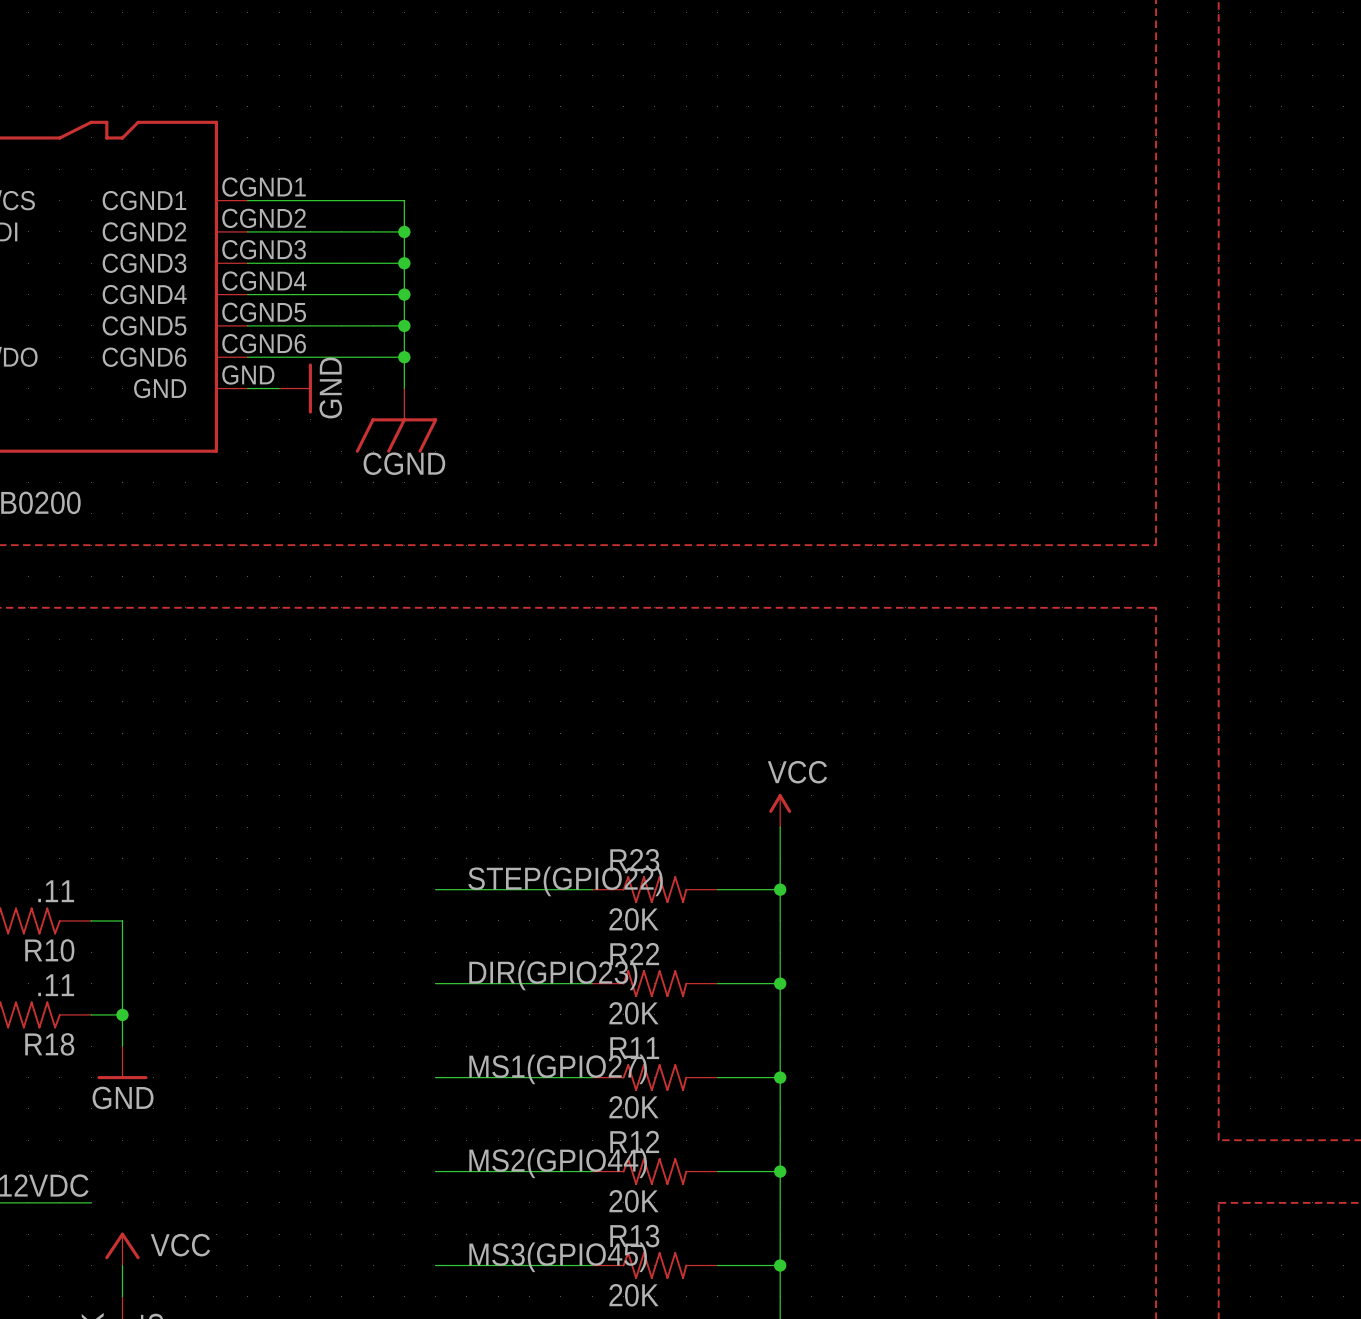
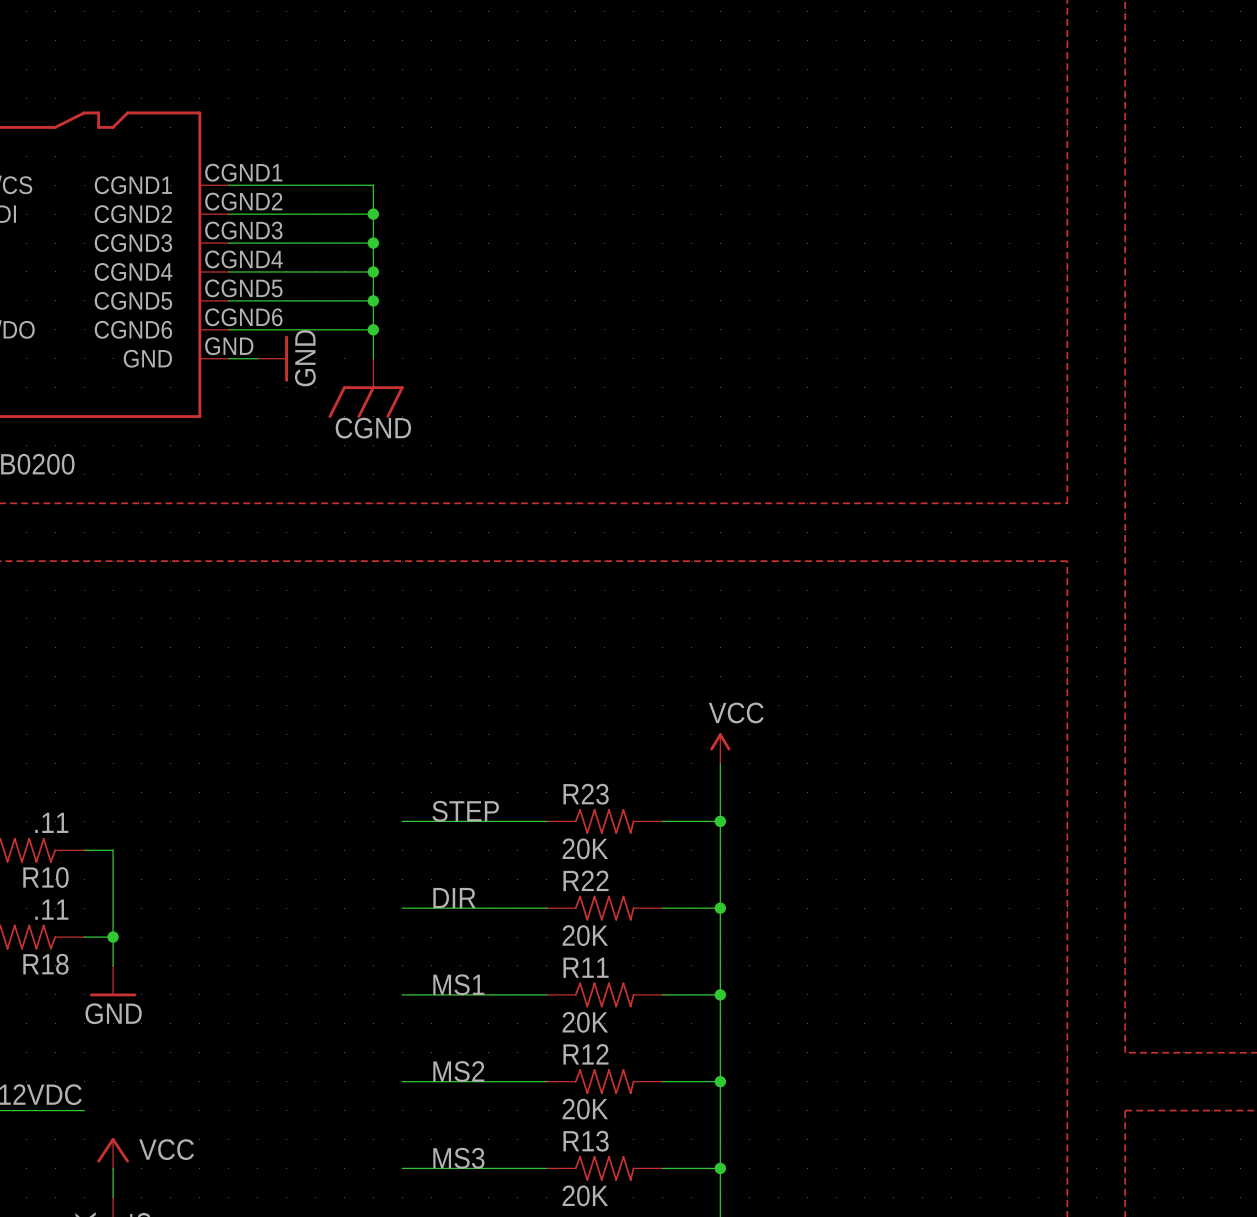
label: STEP(GPIO22) (565, 881) -> STEP (465, 811)
label: DIR(GPIO23) (553, 975) -> DIR (454, 898)
label: MS1(GPIO27) (558, 1069) -> MS1 (458, 984)
label: MS2(GPIO44) (558, 1163) -> MS2 (458, 1071)
label: MS3(GPIO45) (558, 1257) -> MS3 (458, 1158)

